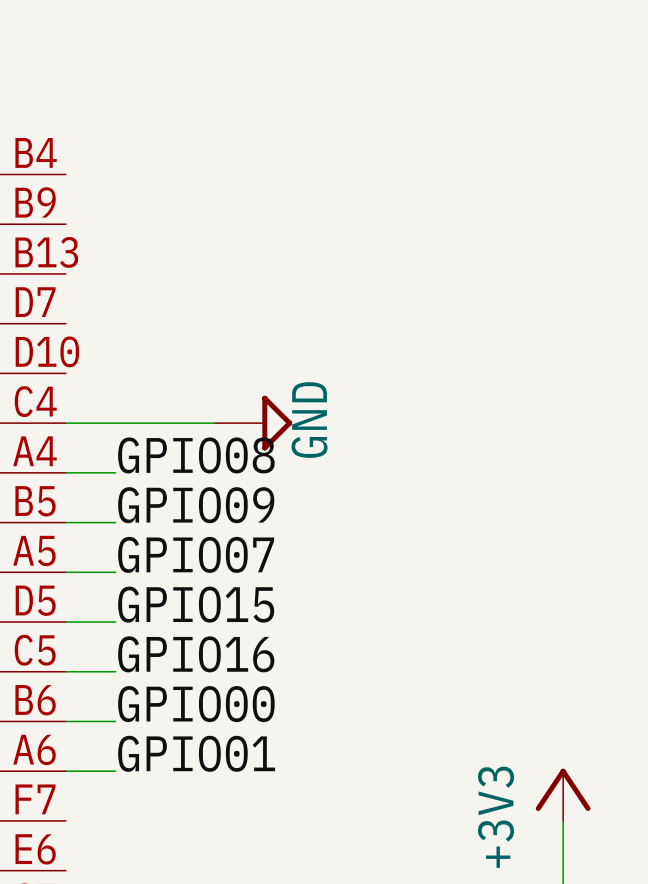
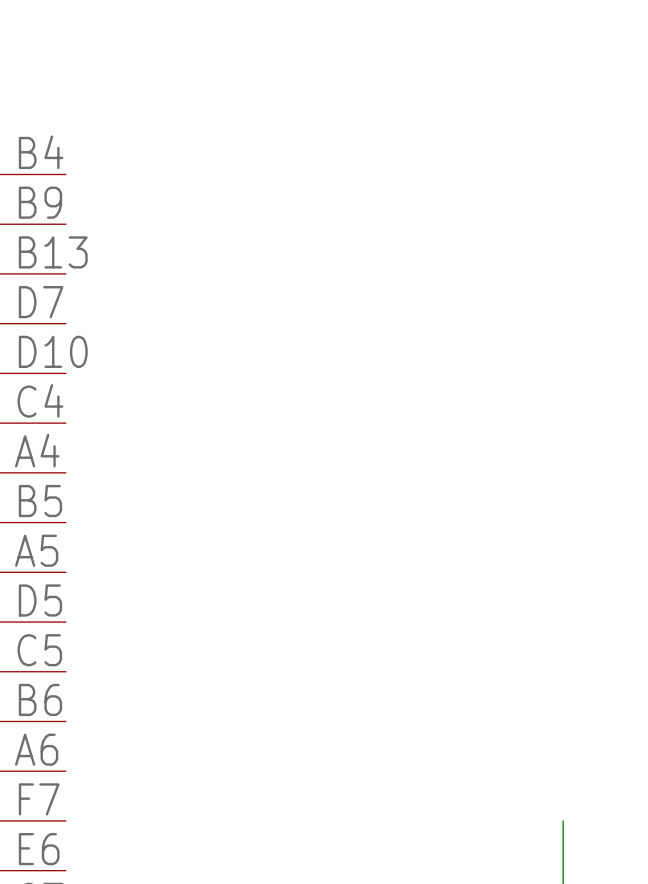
wire: (65, 423) (215, 423) -> none
power symbol: GND (253, 423) -> none
label: GPIO08 (196, 455) -> none
wire: (65, 472) (115, 472) -> none
label: GPIO09 (196, 505) -> none
wire: (65, 522) (115, 522) -> none
label: GPIO07 (196, 554) -> none
wire: (65, 572) (115, 572) -> none
label: GPIO15 (196, 604) -> none
wire: (65, 622) (115, 622) -> none
label: GPIO16 (196, 654) -> none
wire: (65, 671) (115, 671) -> none
label: GPIO00 (196, 704) -> none
wire: (65, 721) (115, 721) -> none
label: GPIO01 (196, 753) -> none
wire: (65, 771) (115, 771) -> none
power symbol: +3V3 (563, 794) -> none

